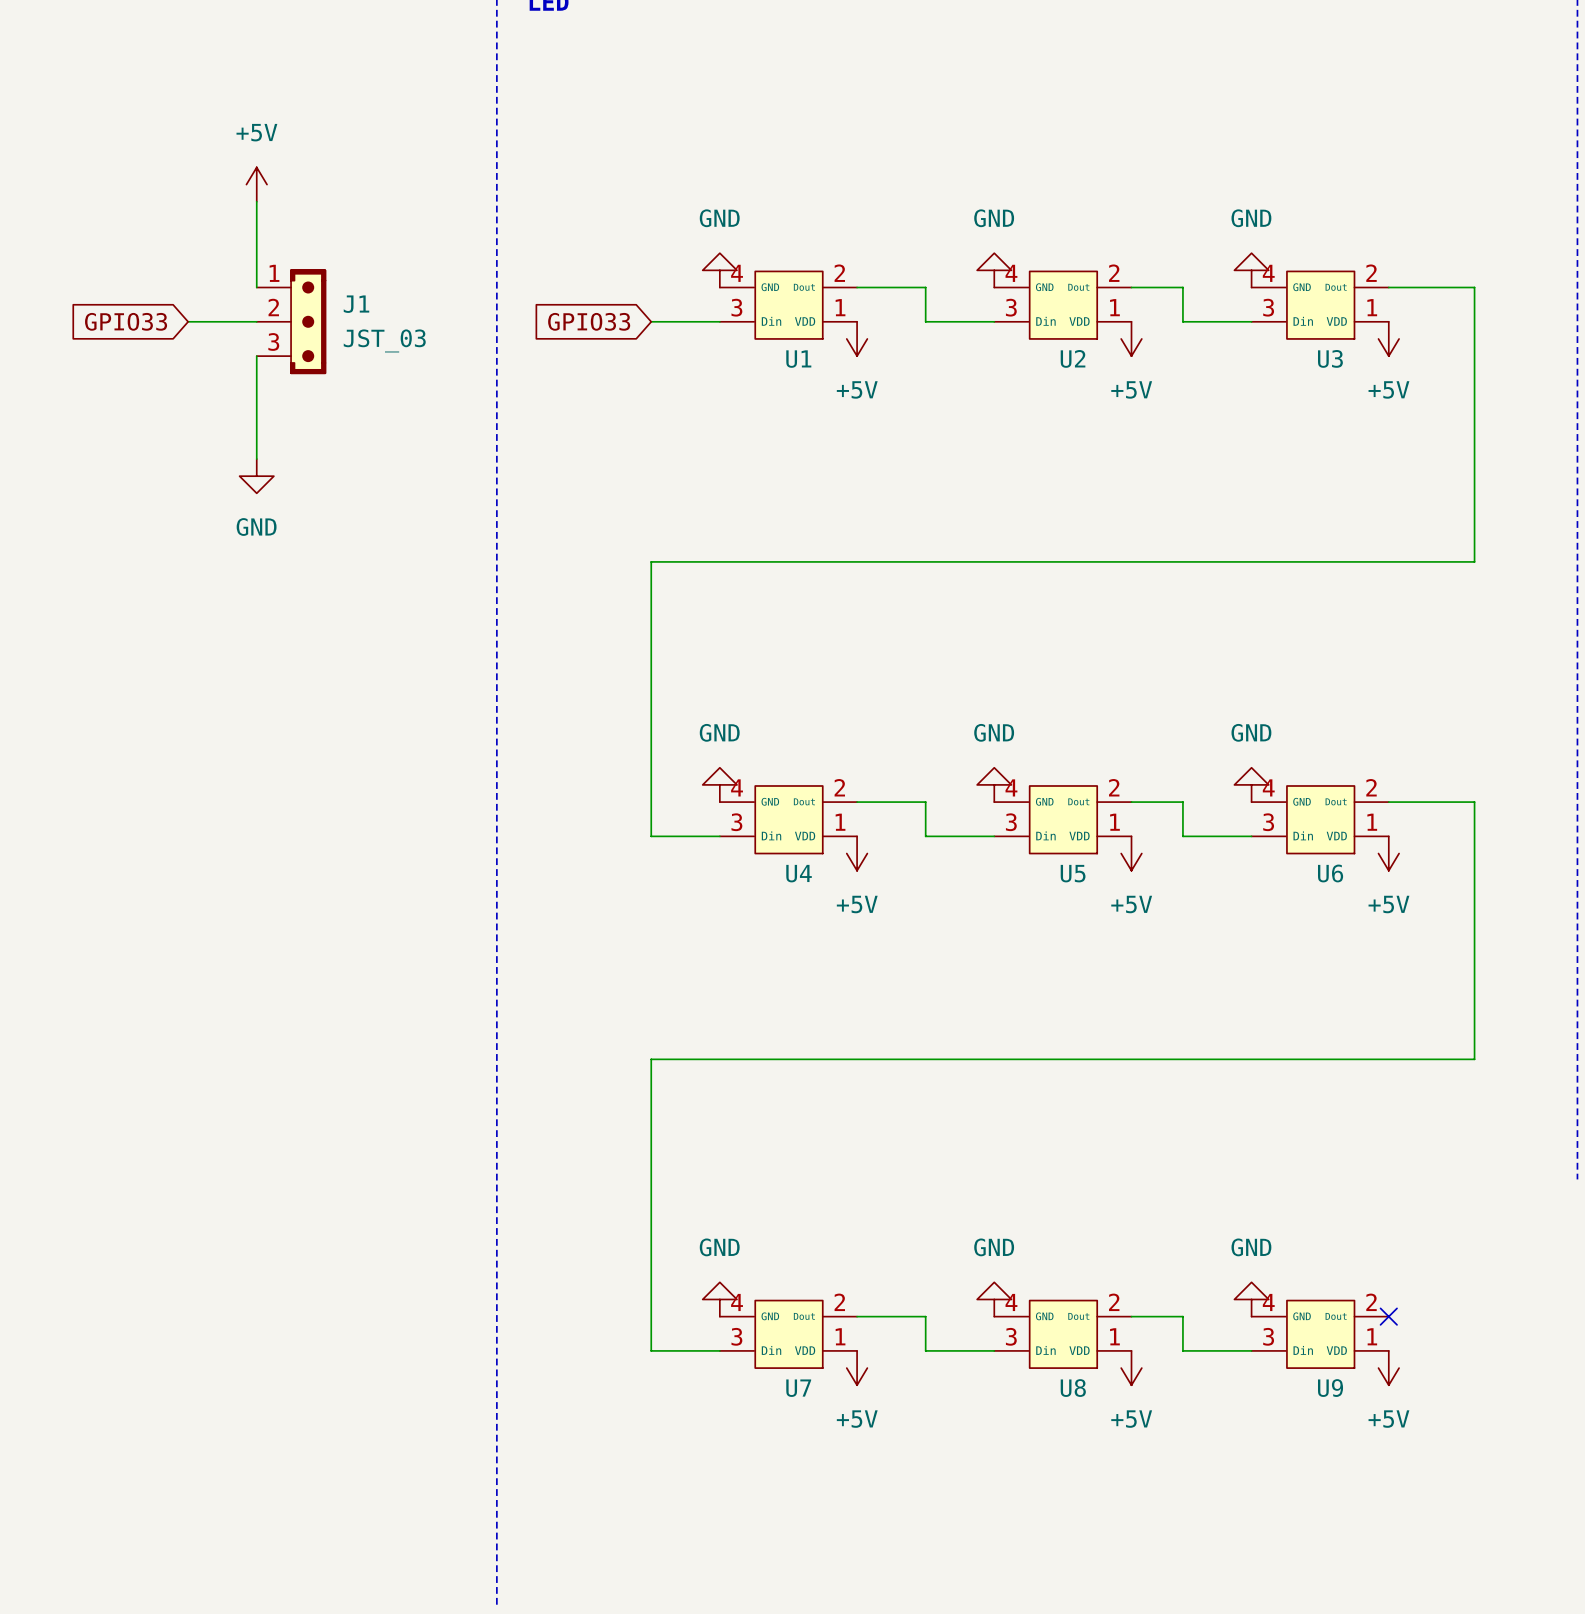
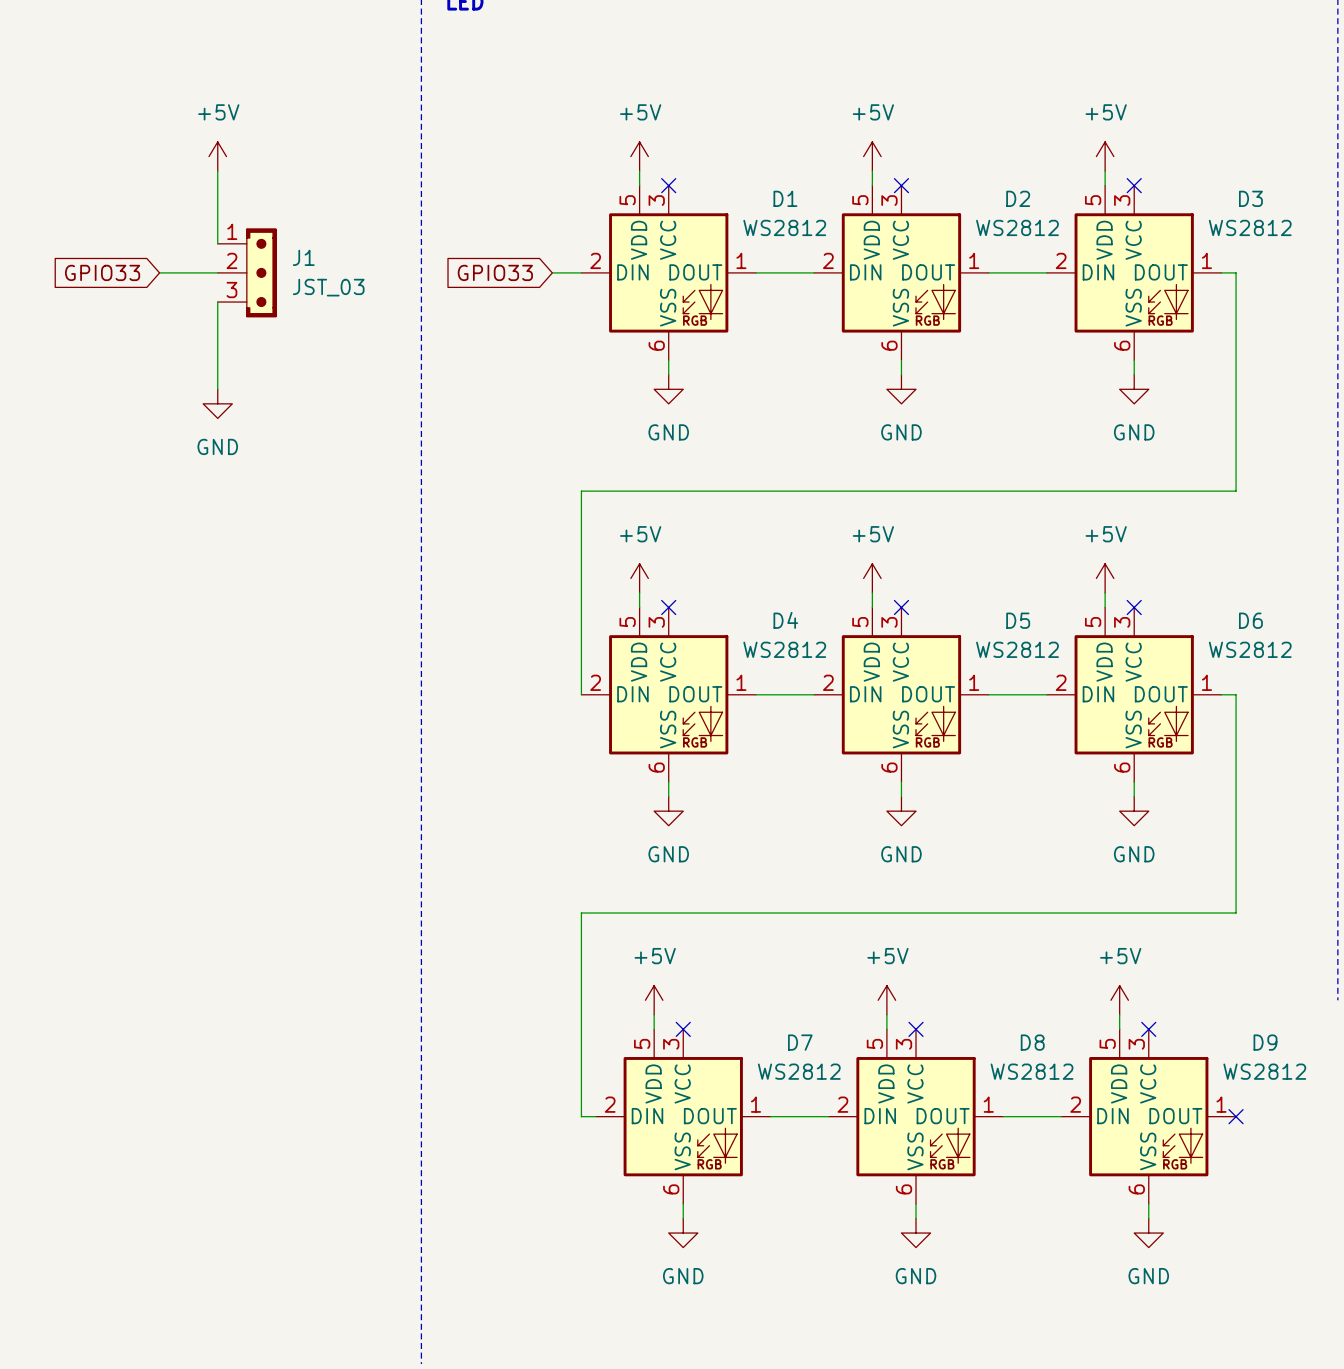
power symbol: none -> +5V (639, 156)
power symbol: none -> +5V (872, 156)
power symbol: none -> +5V (1105, 156)
wire: none -> (639, 171) (639, 185)
wire: none -> (872, 171) (872, 185)
wire: none -> (1105, 171) (1105, 185)
no-connect mark: none -> (668, 185)
no-connect mark: none -> (901, 185)
no-connect mark: none -> (1134, 185)
power symbol: GND (719, 270) -> none
power symbol: GND (994, 270) -> none
power symbol: GND (1251, 270) -> none
wire: (857, 287) (925, 287) (925, 321) -> (755, 272) (785, 272)
wire: (1131, 287) (1182, 287) (1182, 321) -> (988, 272) (1003, 272)
wire: (1388, 287) (1474, 287) (1474, 561) (651, 561) (651, 836) (719, 836) -> none
U1: (788, 305) -> none
U2: (1062, 305) -> none
U3: (1320, 305) -> none
D1: none -> WS2812 (668, 272)
D2: none -> WS2812 (901, 272)
D3: none -> WS2812 (1134, 272)
wire: none -> (1221, 272) (1236, 272) (1236, 491) (581, 491) (581, 694)
power symbol: +5V (857, 338) -> none
power symbol: +5V (1131, 338) -> none
power symbol: +5V (1388, 338) -> none
wire: none -> (668, 360) (668, 374)
wire: none -> (901, 360) (901, 374)
wire: none -> (1134, 360) (1134, 374)
power symbol: none -> GND (668, 389)
power symbol: none -> GND (901, 389)
power symbol: none -> GND (1134, 389)
power symbol: none -> +5V (639, 578)
power symbol: none -> +5V (872, 578)
power symbol: none -> +5V (1105, 578)
wire: none -> (639, 592) (639, 607)
wire: none -> (872, 592) (872, 607)
wire: none -> (1105, 592) (1105, 607)
no-connect mark: none -> (668, 607)
no-connect mark: none -> (901, 607)
no-connect mark: none -> (1134, 607)
power symbol: GND (719, 784) -> none
power symbol: GND (994, 784) -> none
power symbol: GND (1251, 784) -> none
wire: (857, 802) (925, 802) (925, 836) (994, 836) -> none
wire: (1131, 802) (1182, 802) (1182, 836) (1251, 836) -> none
wire: (1388, 802) (1474, 802) (1474, 1059) (651, 1059) (651, 1350) (719, 1350) -> none
U4: (788, 819) -> none
D4: none -> WS2812 (668, 694)
wire: none -> (755, 694) (814, 694)
U5: (1062, 819) -> none
D5: none -> WS2812 (901, 694)
wire: none -> (988, 694) (1046, 694)
U6: (1320, 819) -> none
D6: none -> WS2812 (1134, 694)
wire: none -> (1221, 694) (1236, 694) (1236, 913) (581, 913) (581, 1116) (595, 1116)
power symbol: +5V (857, 853) -> none
power symbol: +5V (1131, 853) -> none
power symbol: +5V (1388, 853) -> none
wire: none -> (668, 782) (668, 796)
wire: none -> (901, 782) (901, 796)
wire: none -> (1134, 782) (1134, 796)
power symbol: none -> GND (668, 811)
power symbol: none -> GND (901, 811)
power symbol: none -> GND (1134, 811)
power symbol: none -> +5V (654, 1000)
power symbol: none -> +5V (886, 1000)
power symbol: none -> +5V (1119, 1000)
wire: none -> (654, 1014) (654, 1029)
wire: none -> (886, 1014) (886, 1029)
wire: none -> (1119, 1014) (1119, 1029)
no-connect mark: none -> (683, 1029)
no-connect mark: none -> (916, 1029)
no-connect mark: none -> (1148, 1029)
power symbol: GND (719, 1299) -> none
power symbol: GND (994, 1299) -> none
power symbol: GND (1251, 1299) -> none
D7: none -> WS2812 (683, 1116)
wire: (925, 1316) (925, 1350) (994, 1350) -> (785, 1116) (828, 1116)
D8: none -> WS2812 (916, 1116)
wire: (1131, 1316) (1182, 1316) (1182, 1350) (1251, 1350) -> none
wire: none -> (1003, 1116) (1061, 1116)
D9: none -> WS2812 (1148, 1116)
no-connect mark: (1388, 1316) -> none
no-connect mark: none -> (1236, 1116)
U7: (788, 1334) -> none
U8: (1062, 1334) -> none
U9: (1320, 1334) -> none
power symbol: +5V (857, 1368) -> none
power symbol: +5V (1131, 1368) -> none
power symbol: +5V (1388, 1368) -> none
wire: none -> (683, 1203) (683, 1218)
wire: none -> (916, 1203) (916, 1218)
wire: none -> (1148, 1203) (1148, 1218)
power symbol: none -> GND (683, 1233)
power symbol: none -> GND (916, 1233)
power symbol: none -> GND (1148, 1233)

